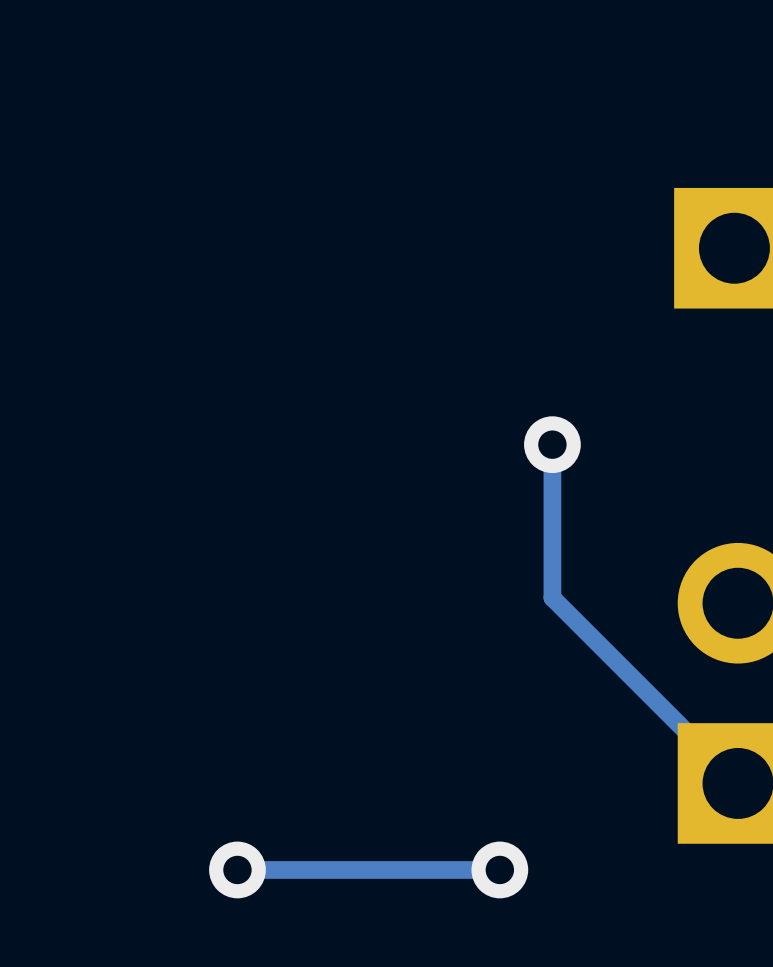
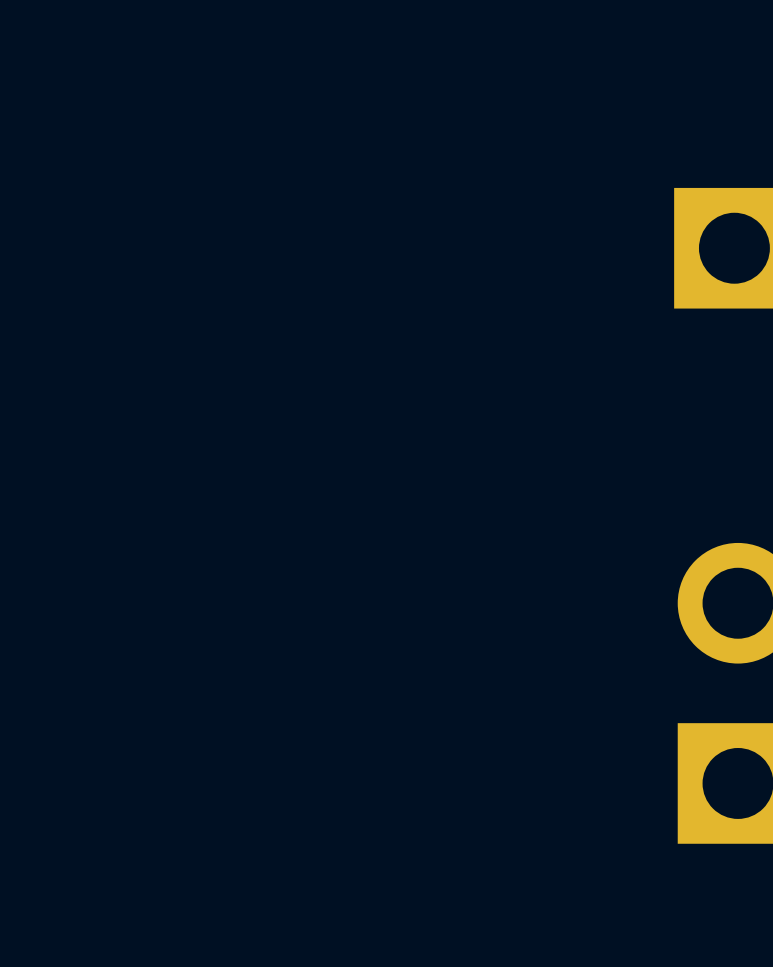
track: (552, 444) (552, 597) (738, 783) -> none
via: (552, 444) -> none
via: (237, 869) -> none
track: (499, 869) (237, 869) -> none
via: (499, 869) -> none

